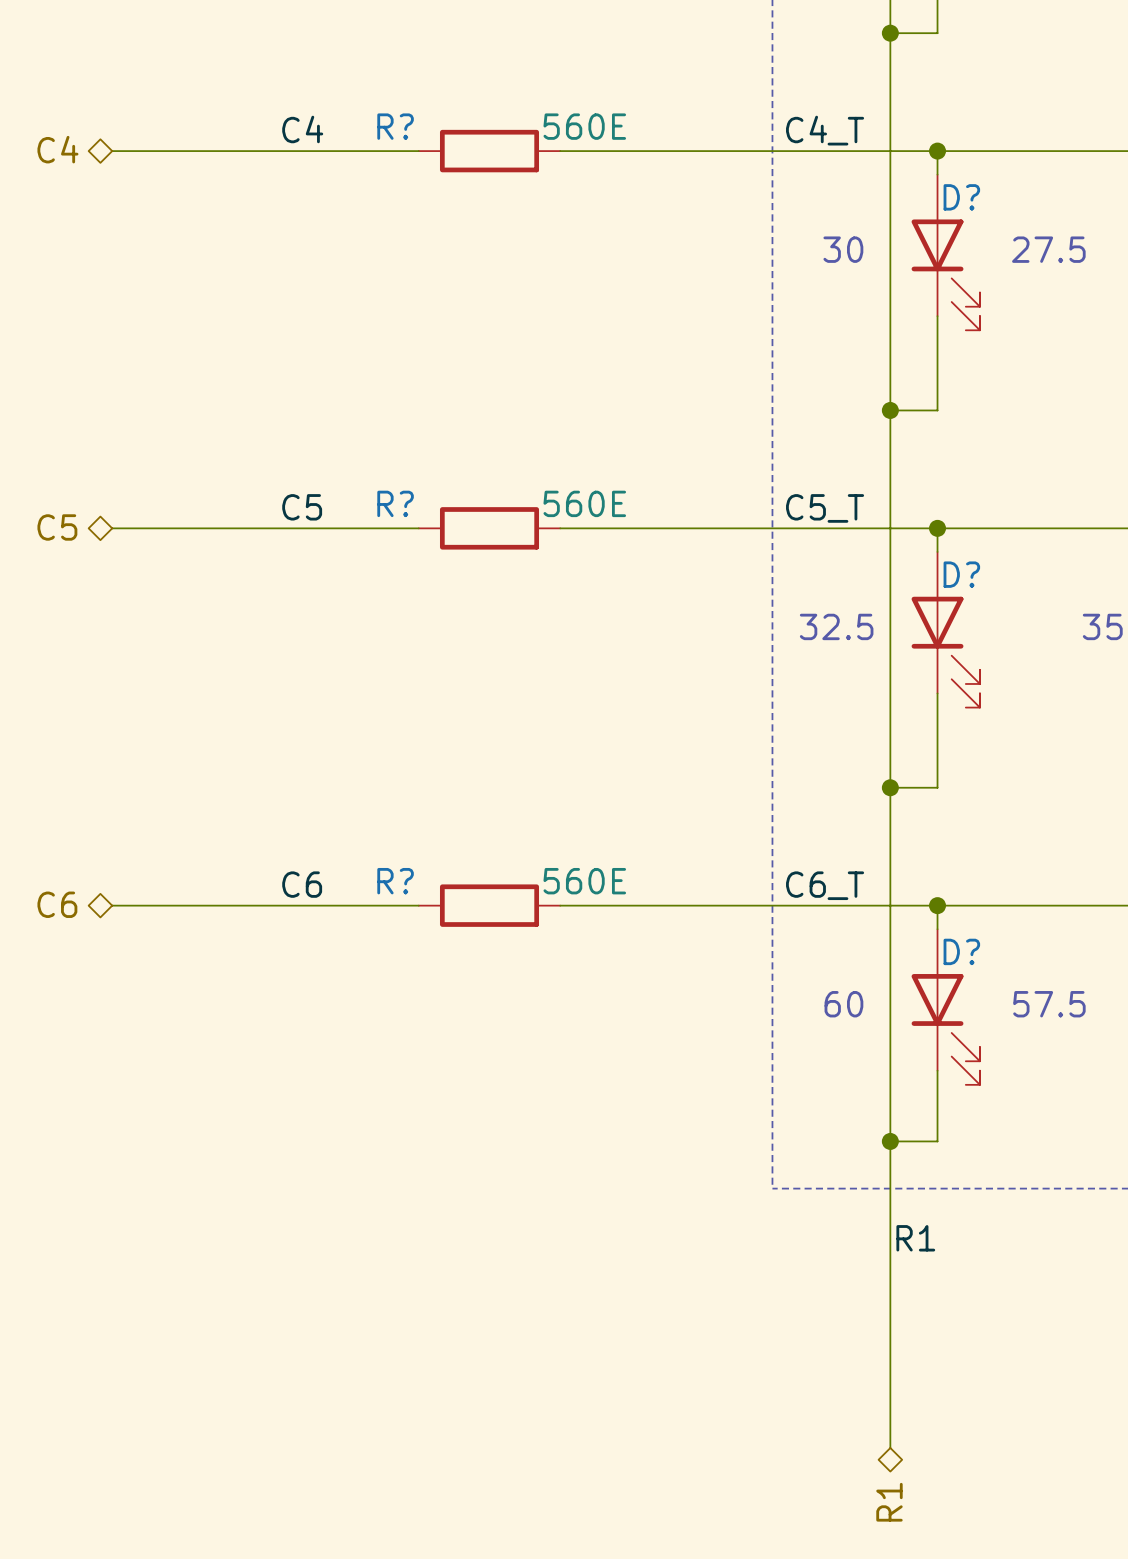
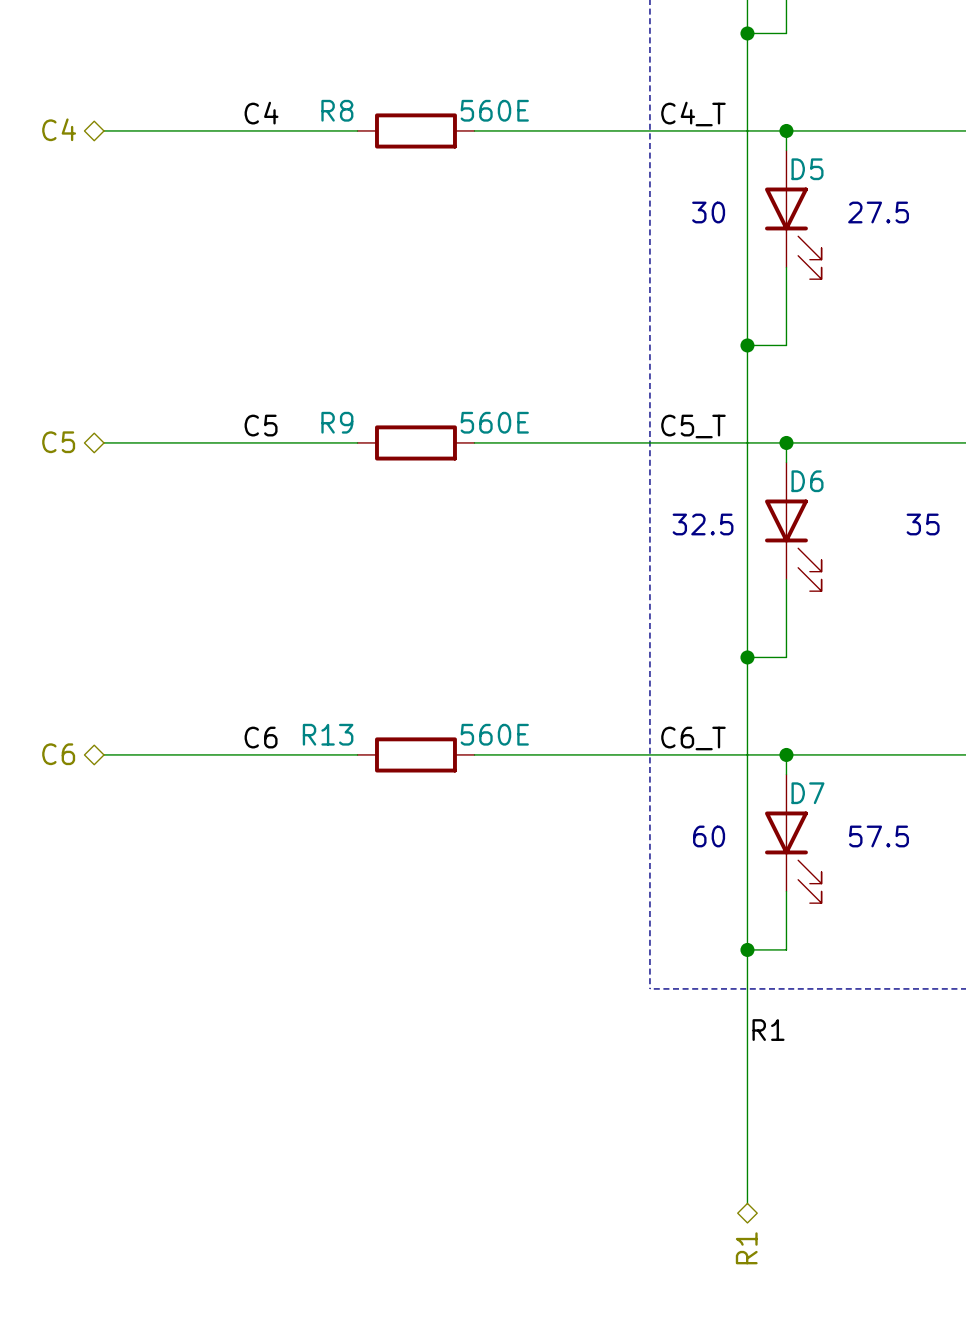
R? name: R? (395, 126) -> R8 (337, 110)
D? name: D? (961, 197) -> D5 (807, 169)
R? name: R? (395, 503) -> R9 (337, 422)
D? name: D? (961, 574) -> D6 (807, 481)
R? name: R? (395, 881) -> R13 (328, 734)
D? name: D? (961, 951) -> D7 (807, 793)

